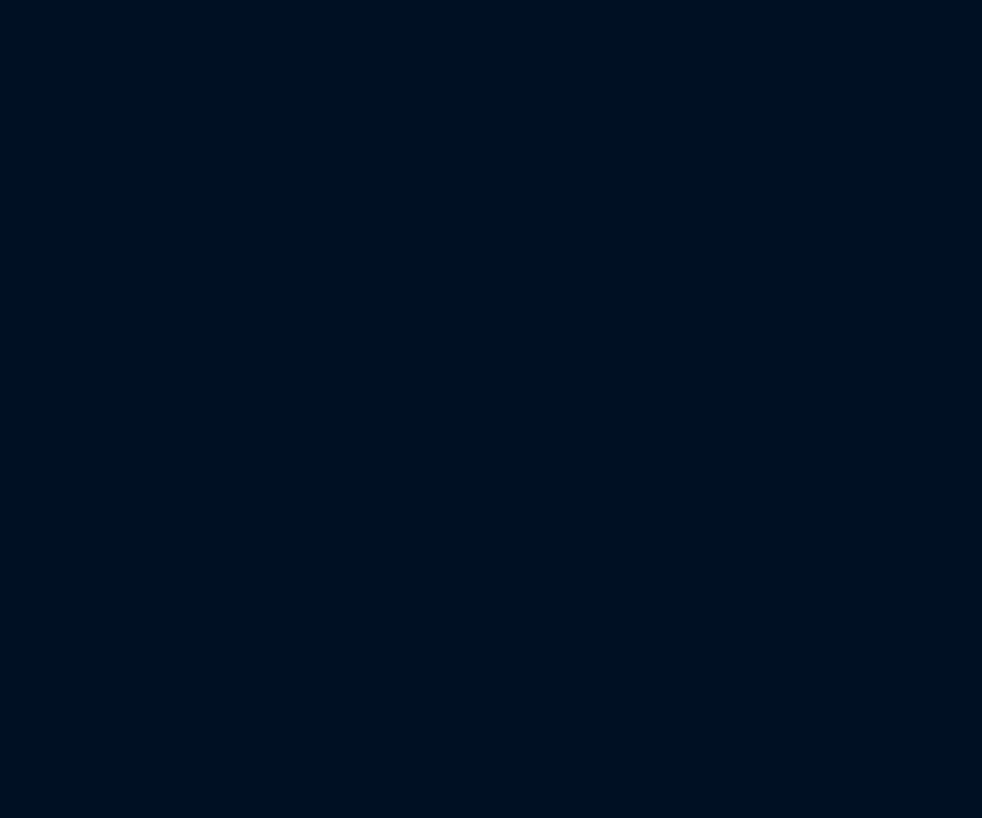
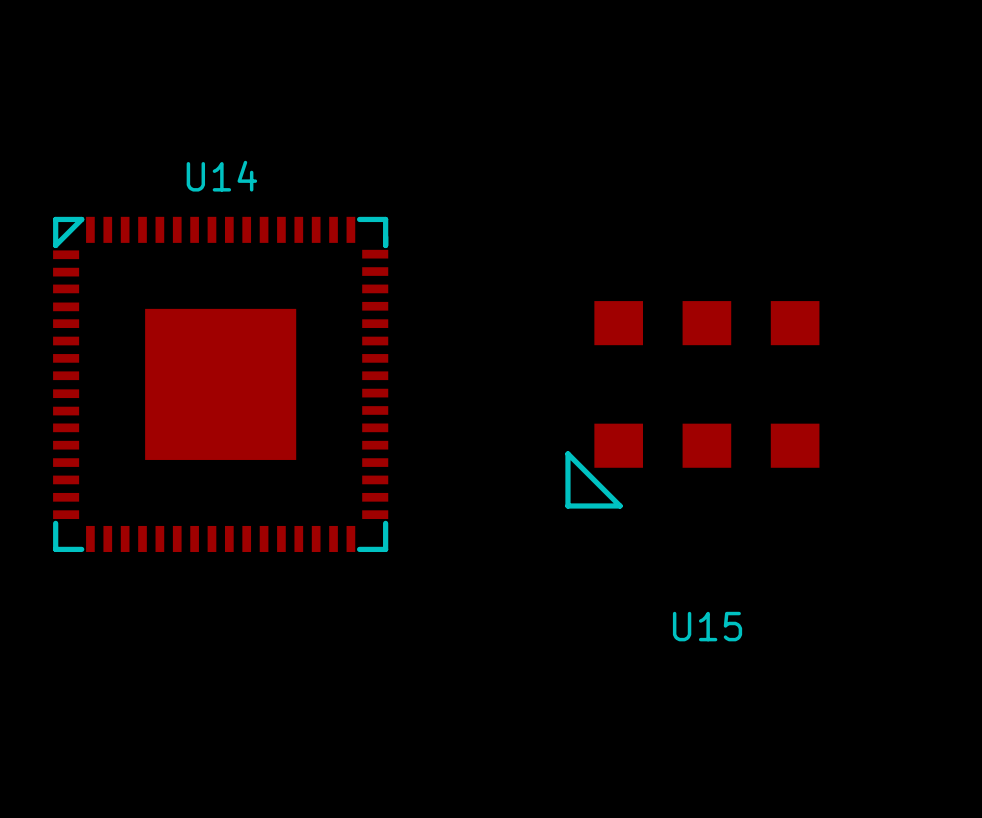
U14: none -> (220, 384)
U15: none -> (692, 404)

